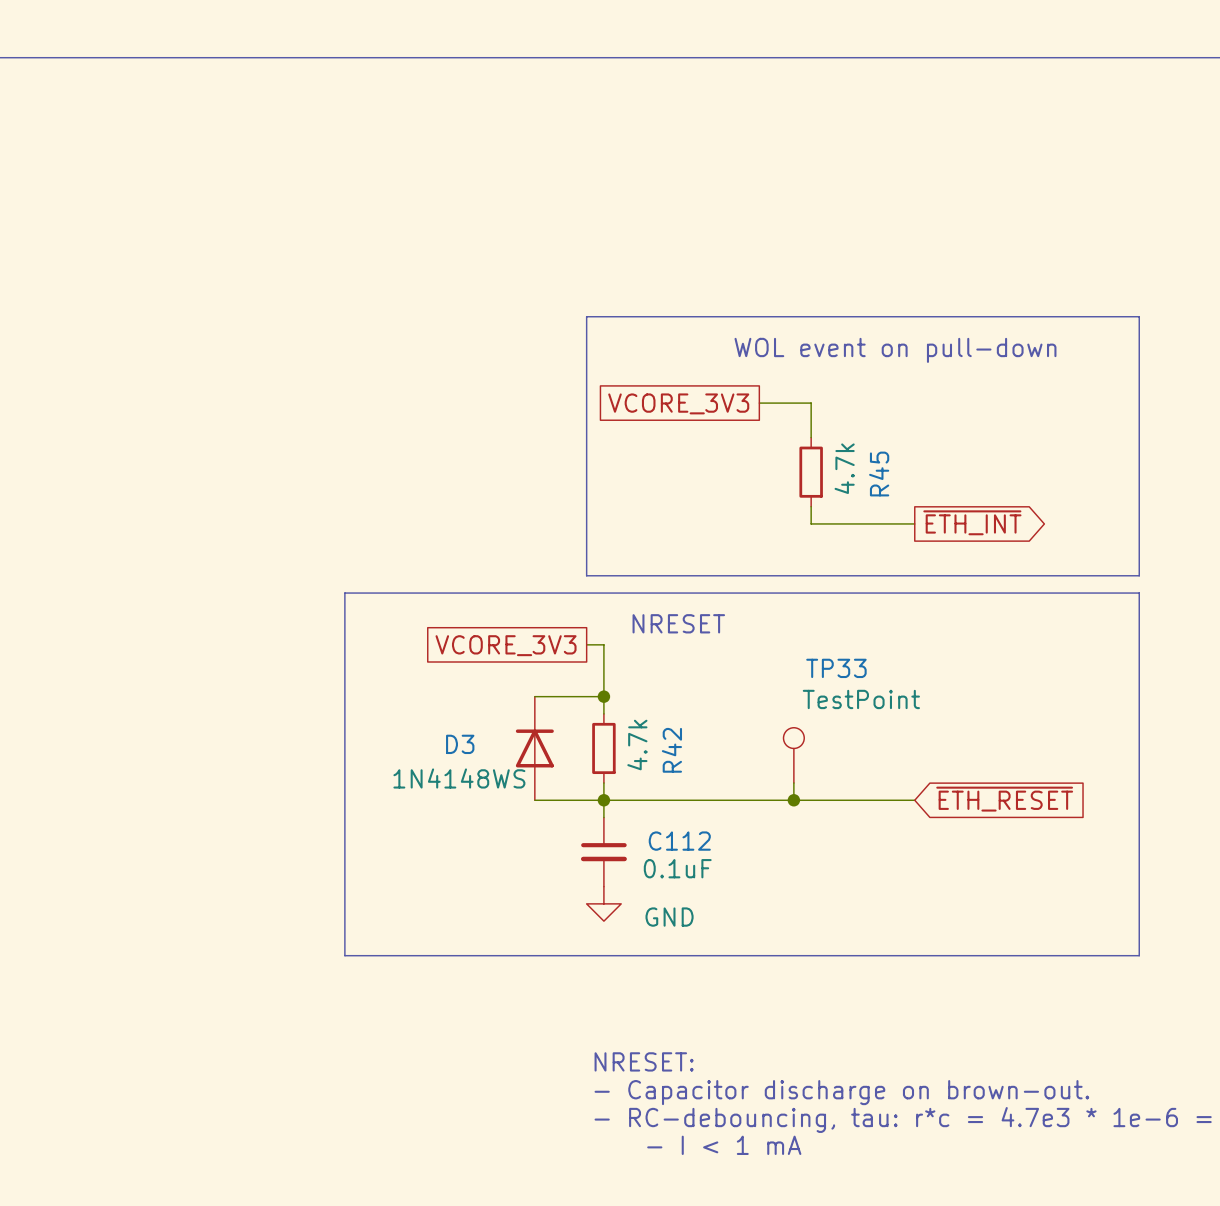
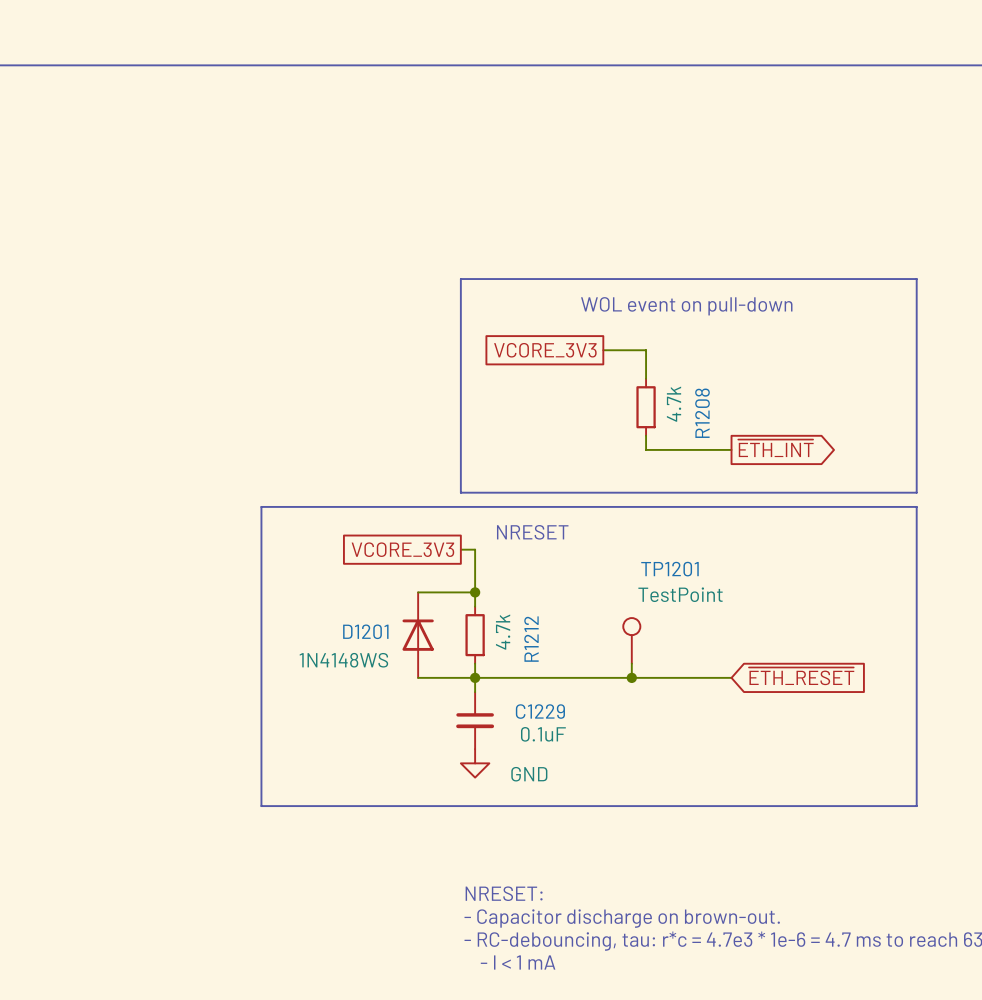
R45 name: R45 (879, 474) -> R1208 (702, 413)
TP33 name: TP33 (836, 668) -> TP1201 (669, 569)
D3 name: D3 (460, 744) -> D1201 (365, 631)
R42 name: R42 (671, 750) -> R1212 (531, 639)
C112 name: C112 (679, 841) -> C1229 (540, 711)

